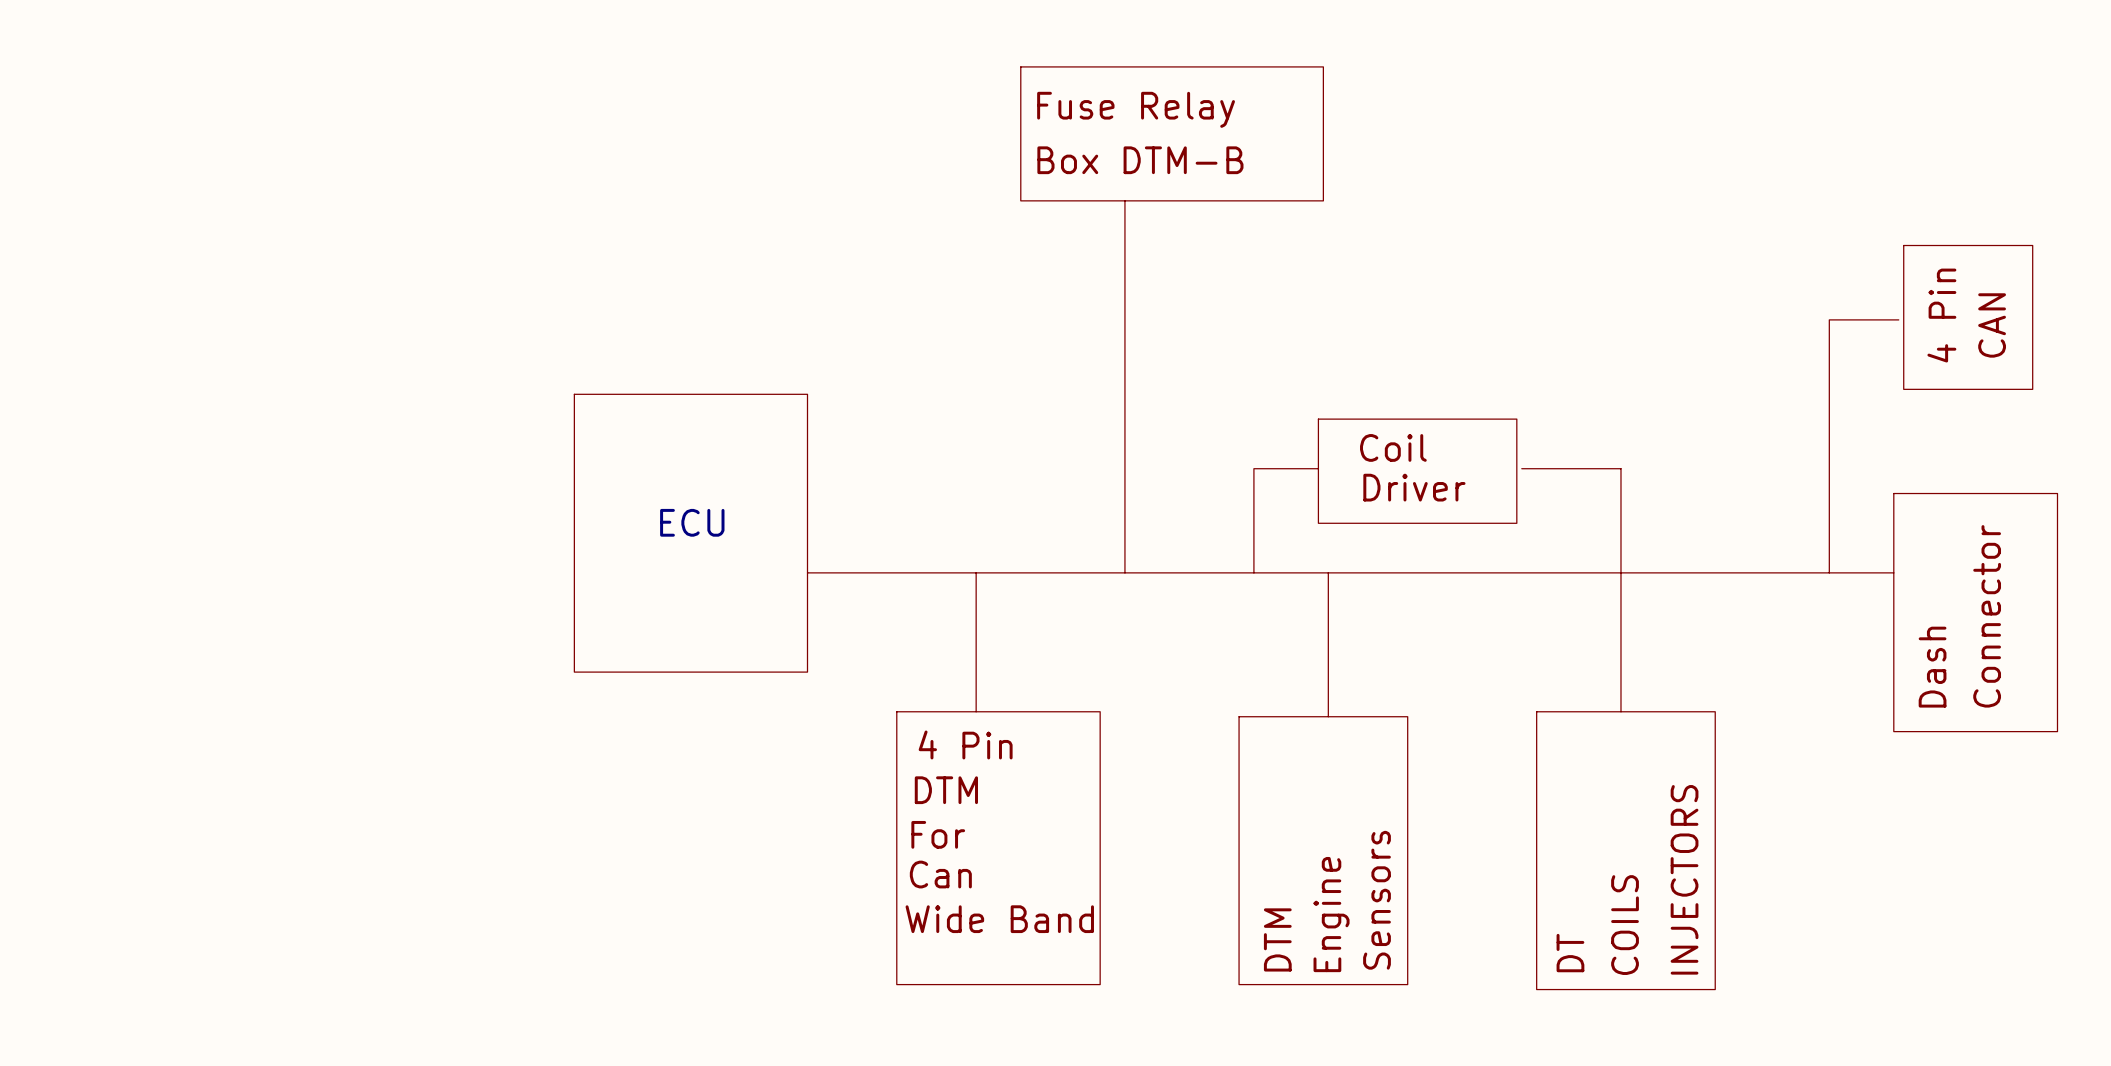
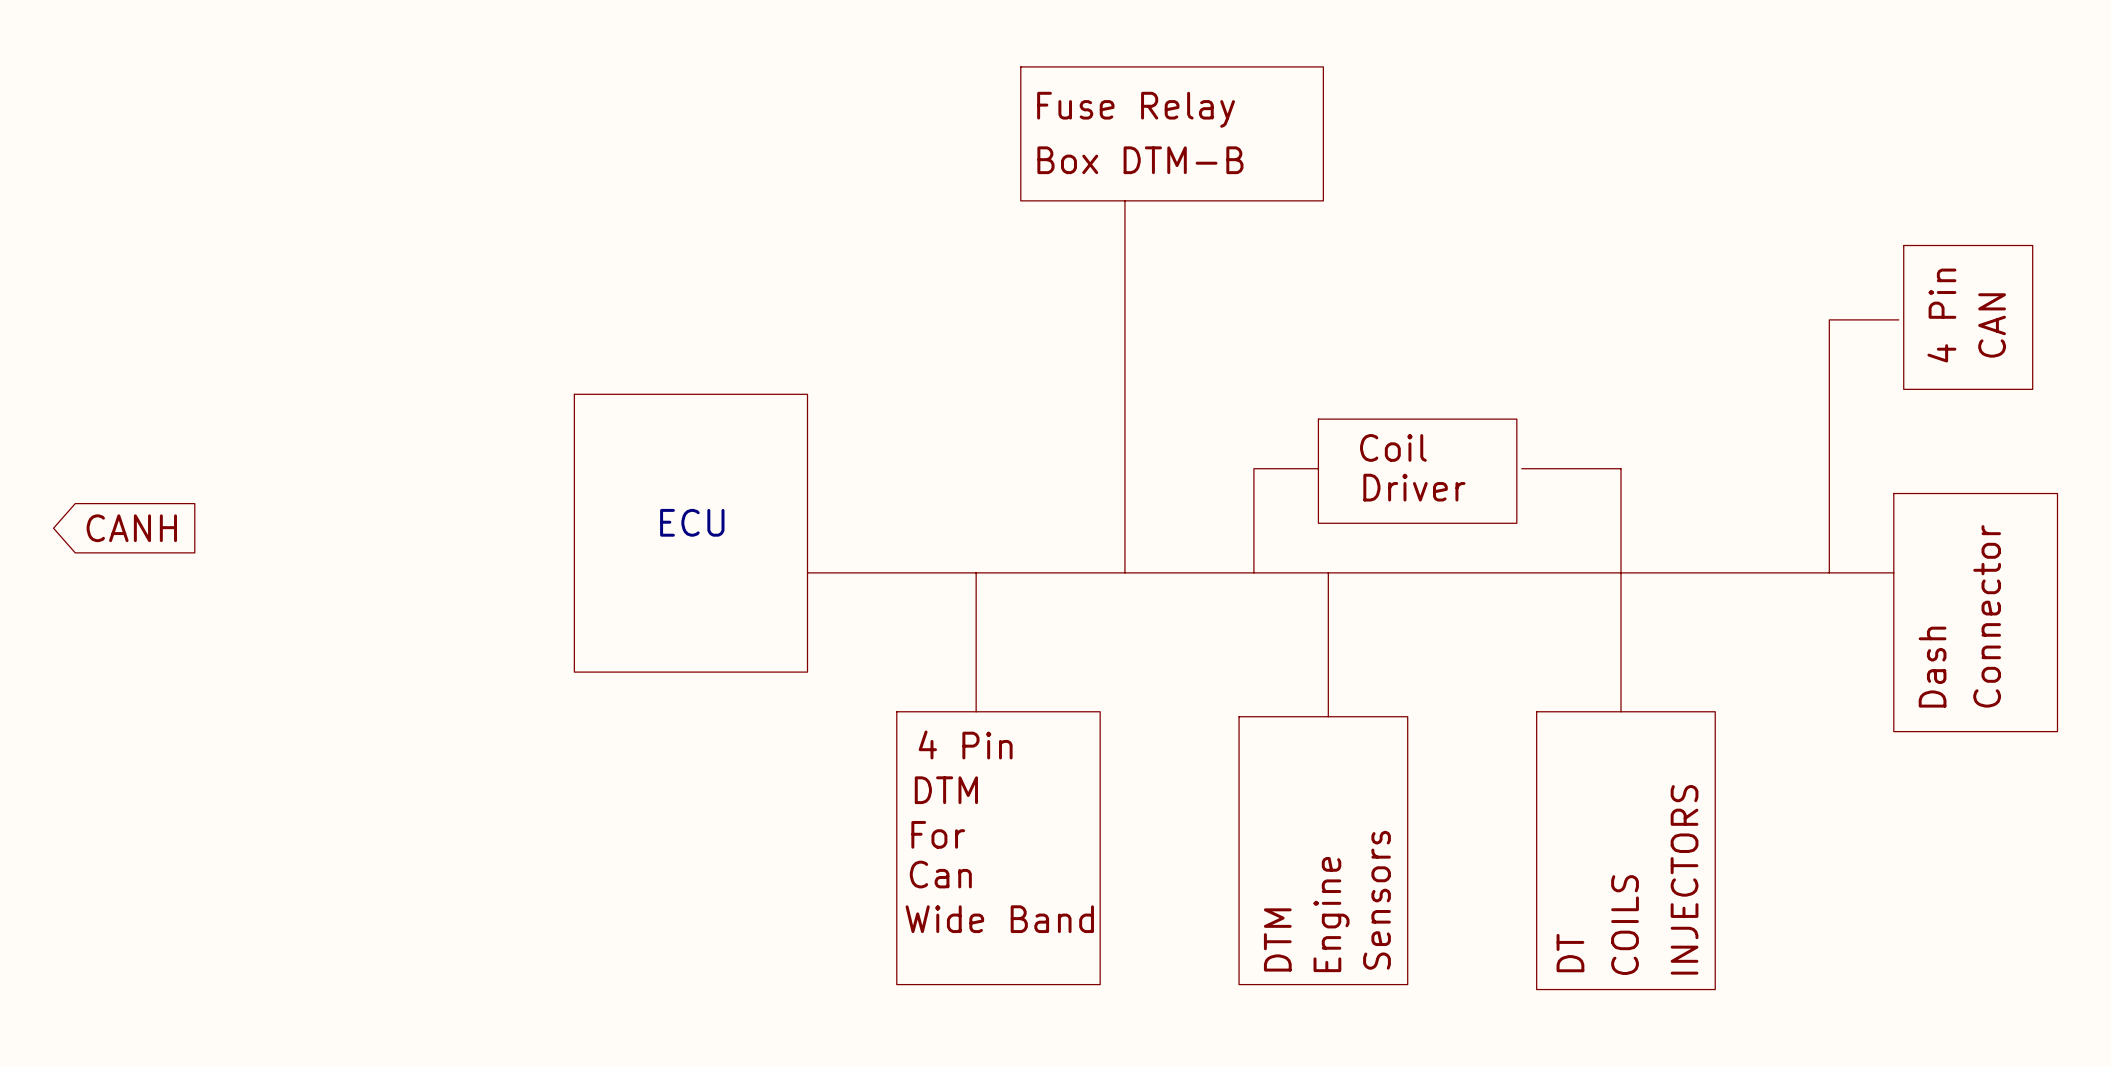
global label: none -> CANH (131, 528)

